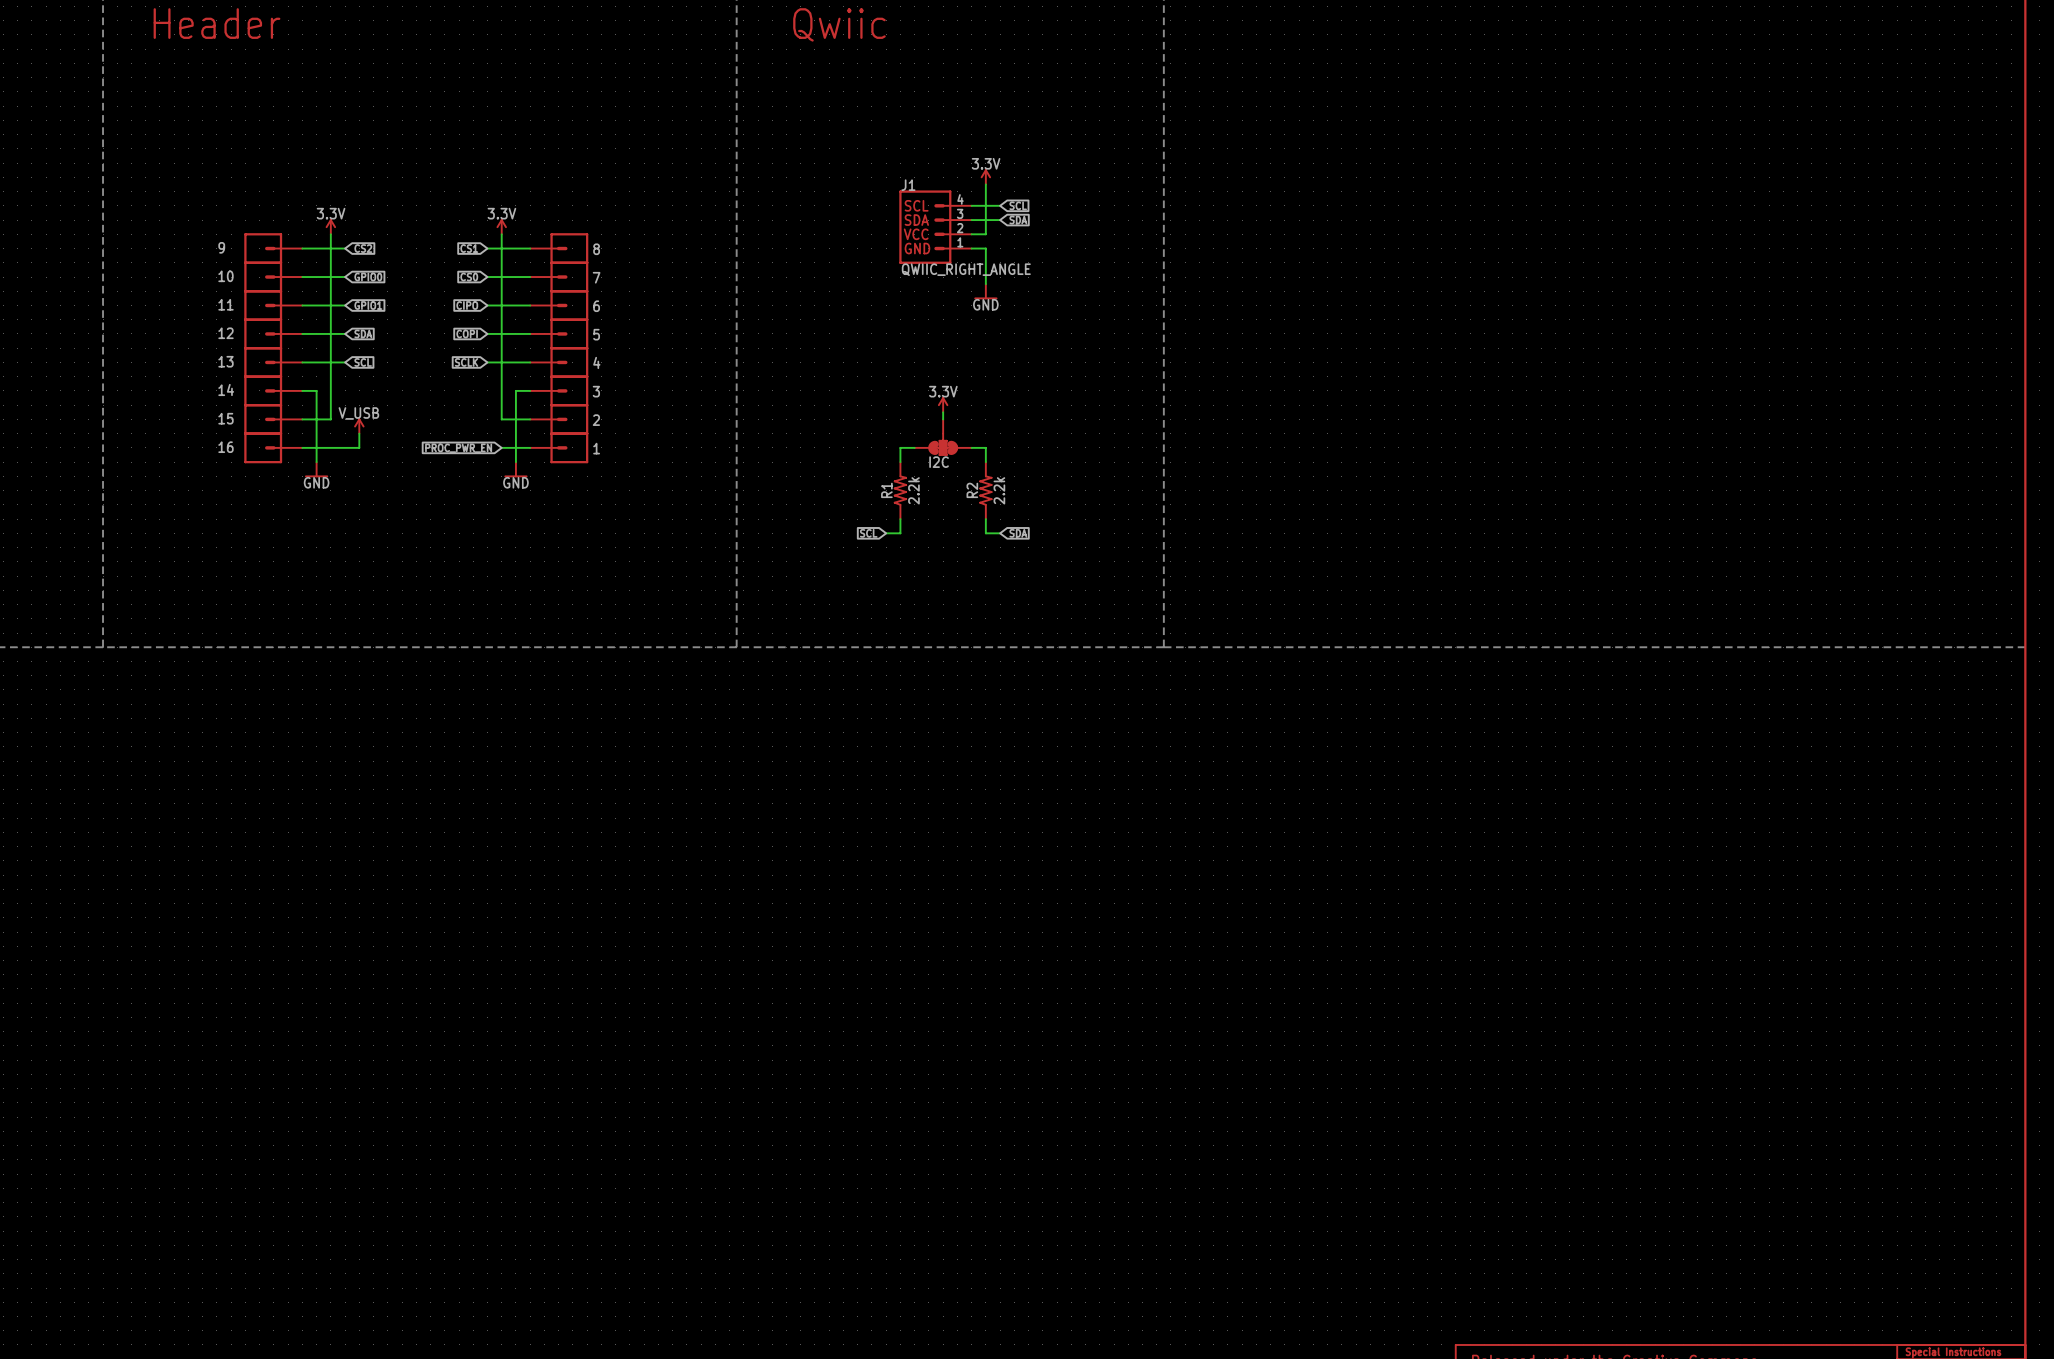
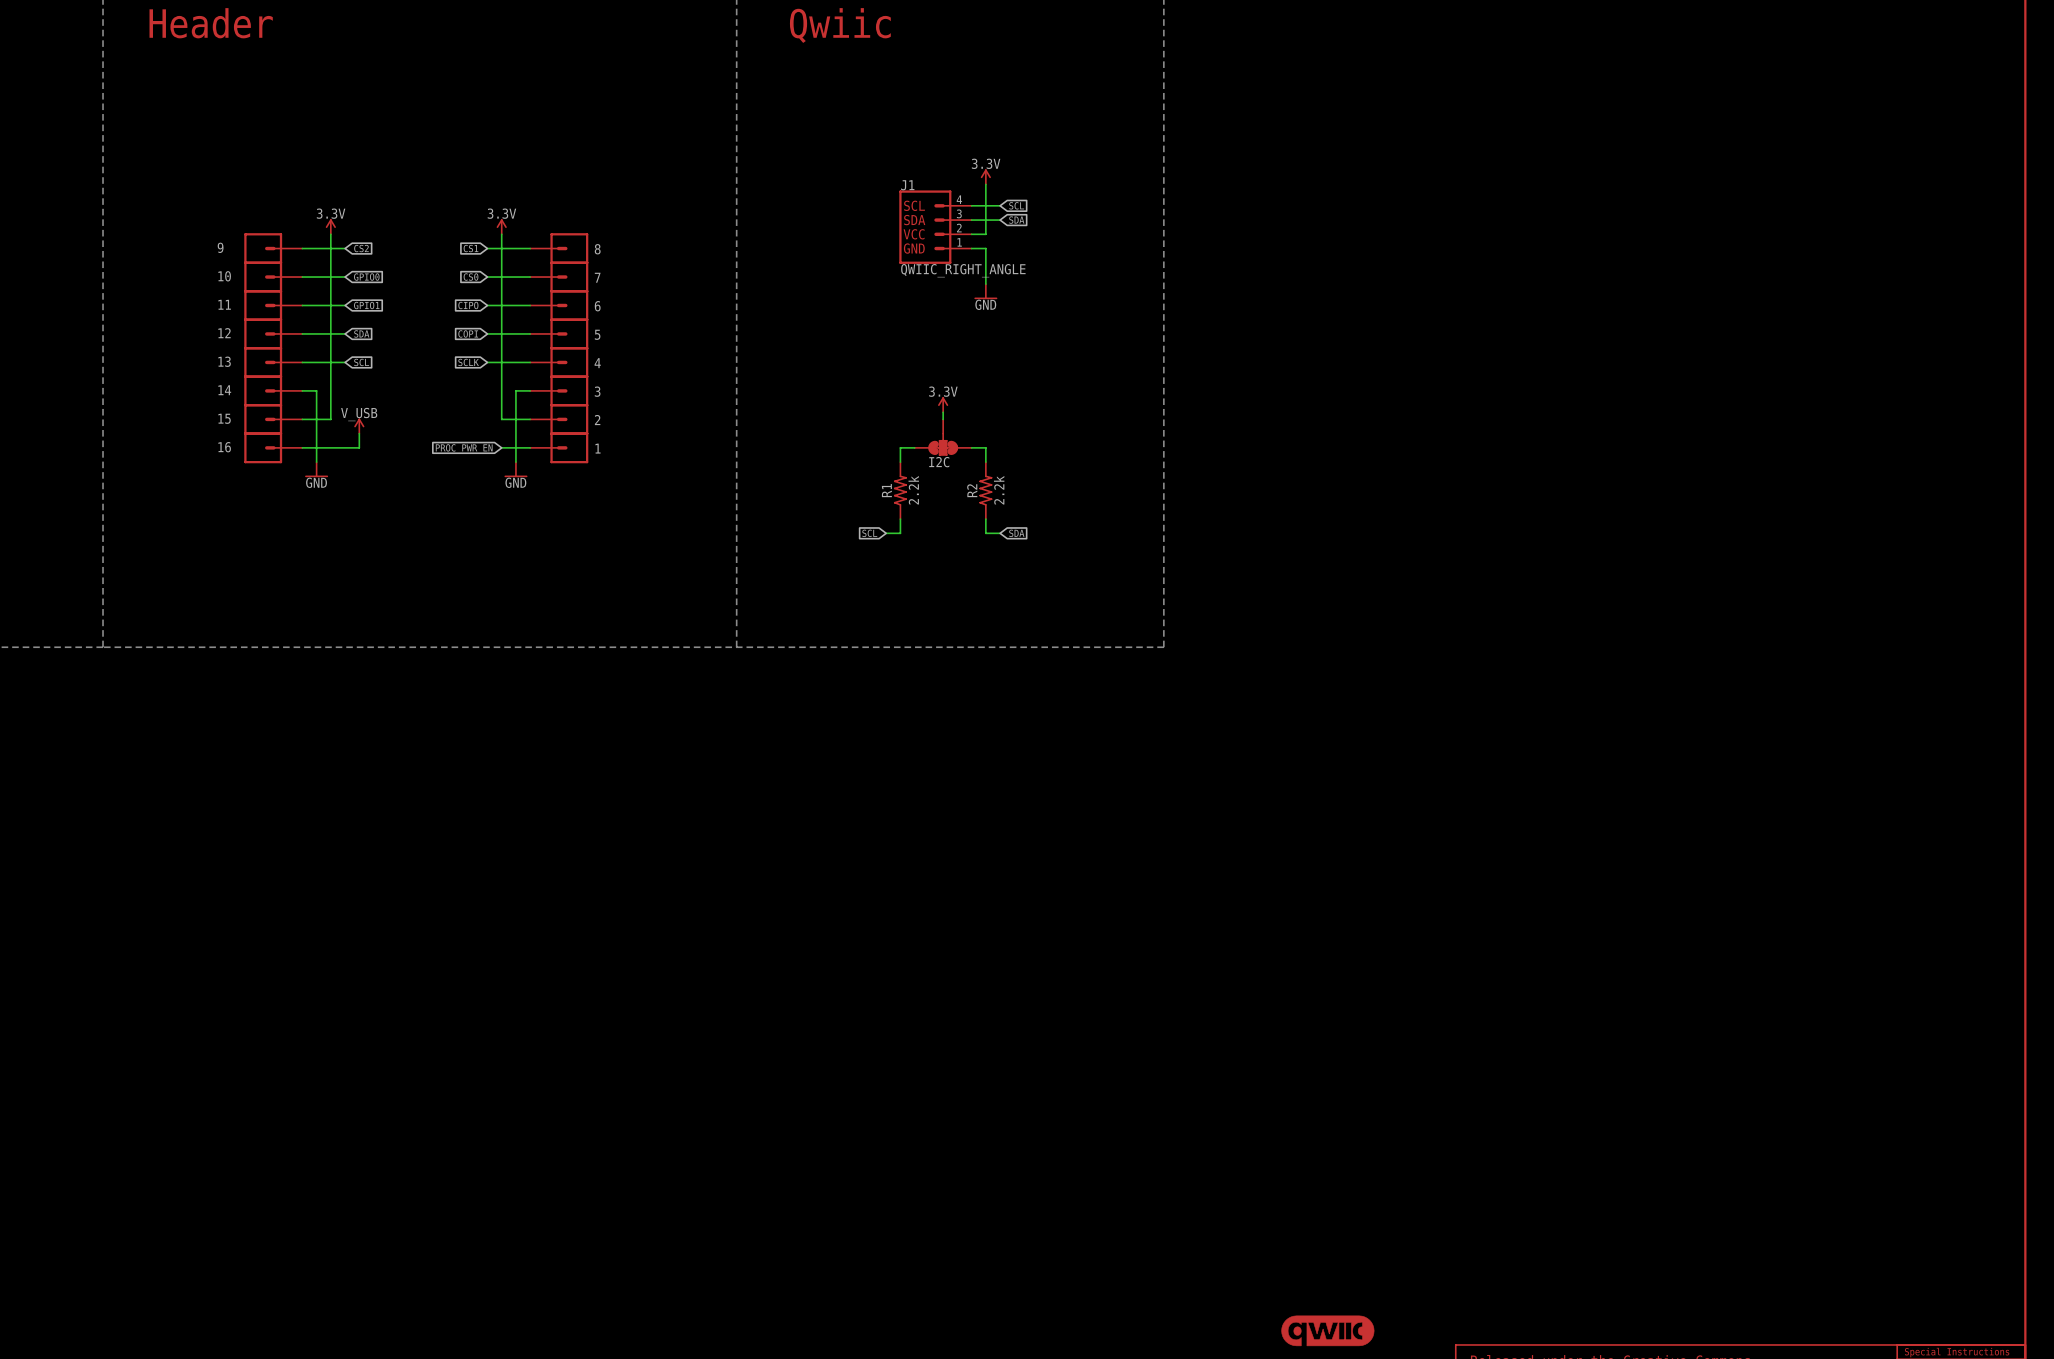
line: (1163, 647) (2025, 647) -> none
part: none -> (1327, 1330)

